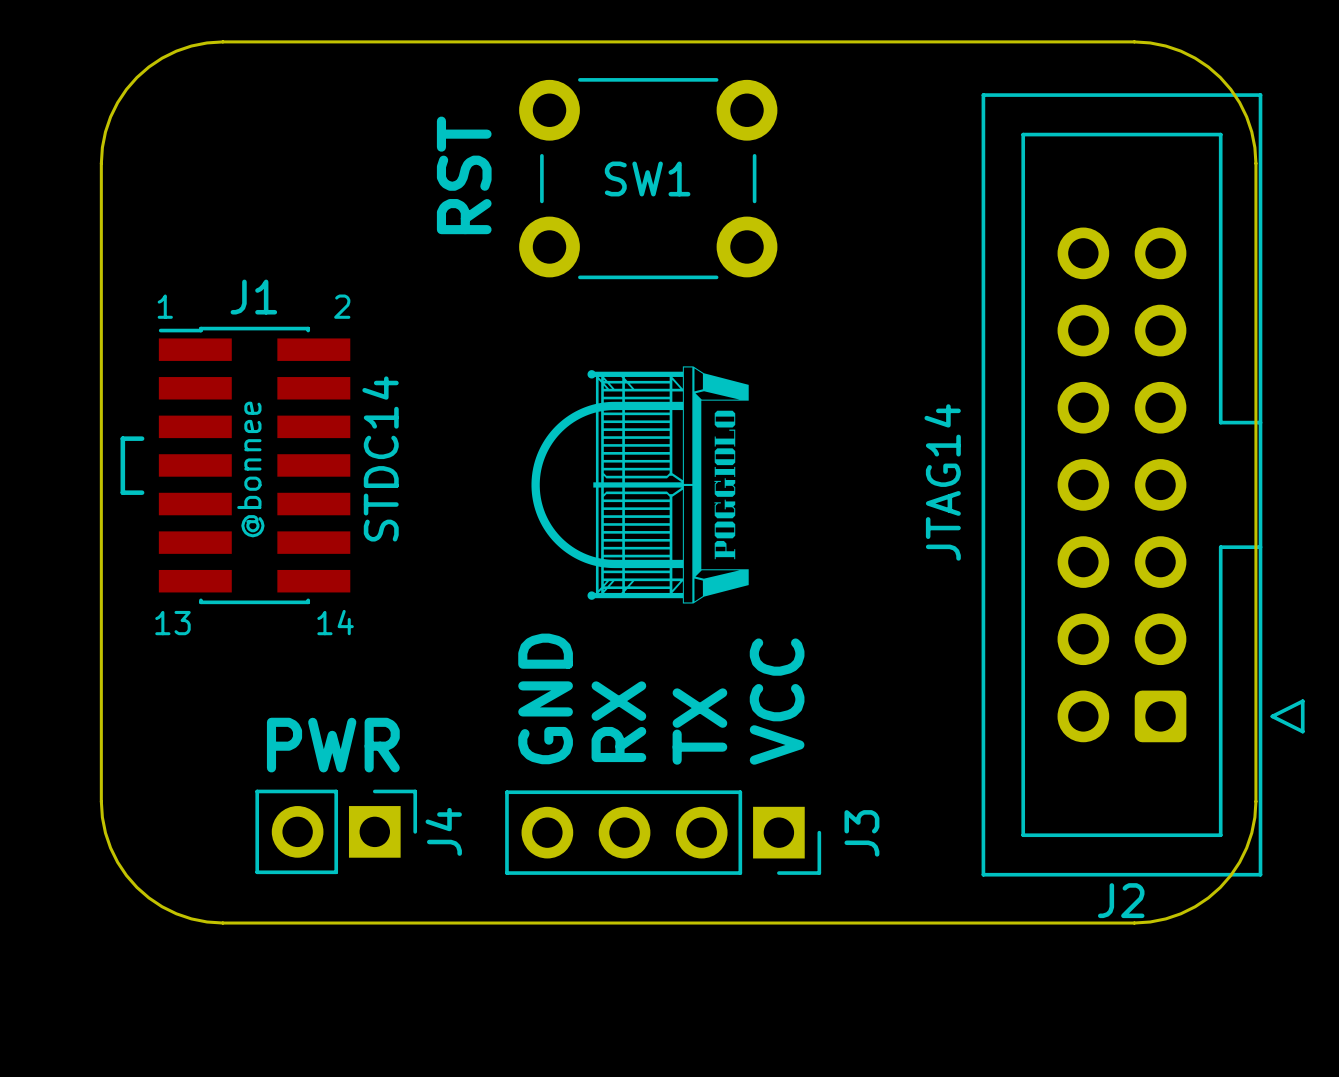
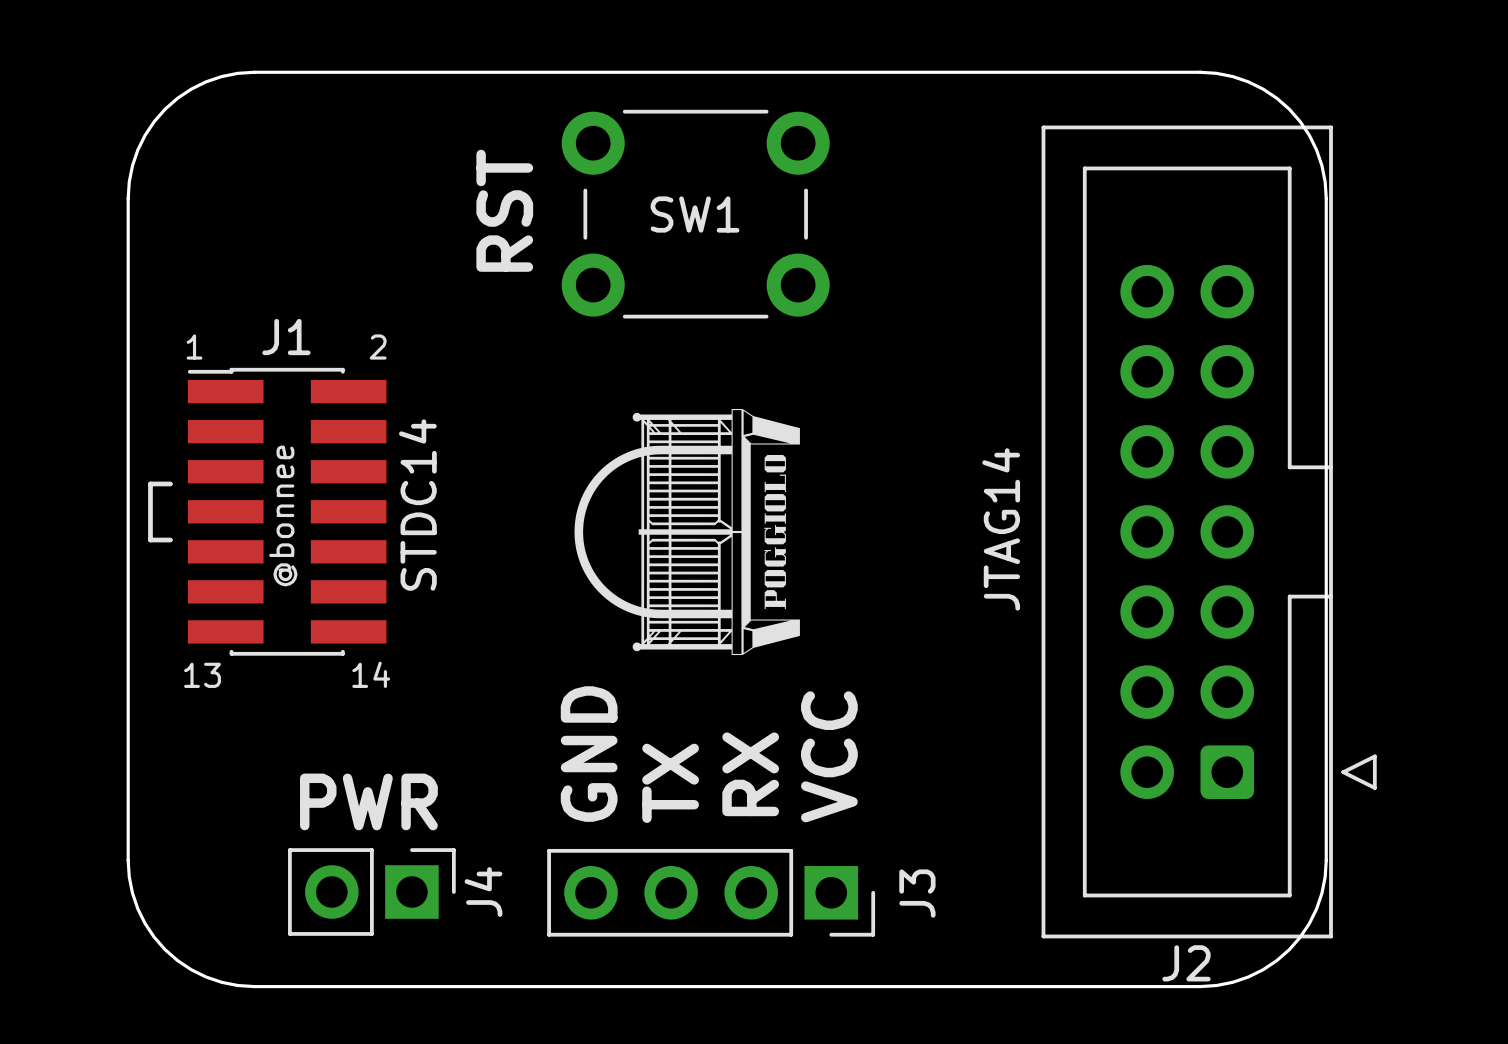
text: RX (618, 721) -> TX (670, 783)
text: TX (699, 726) -> RX (750, 774)

